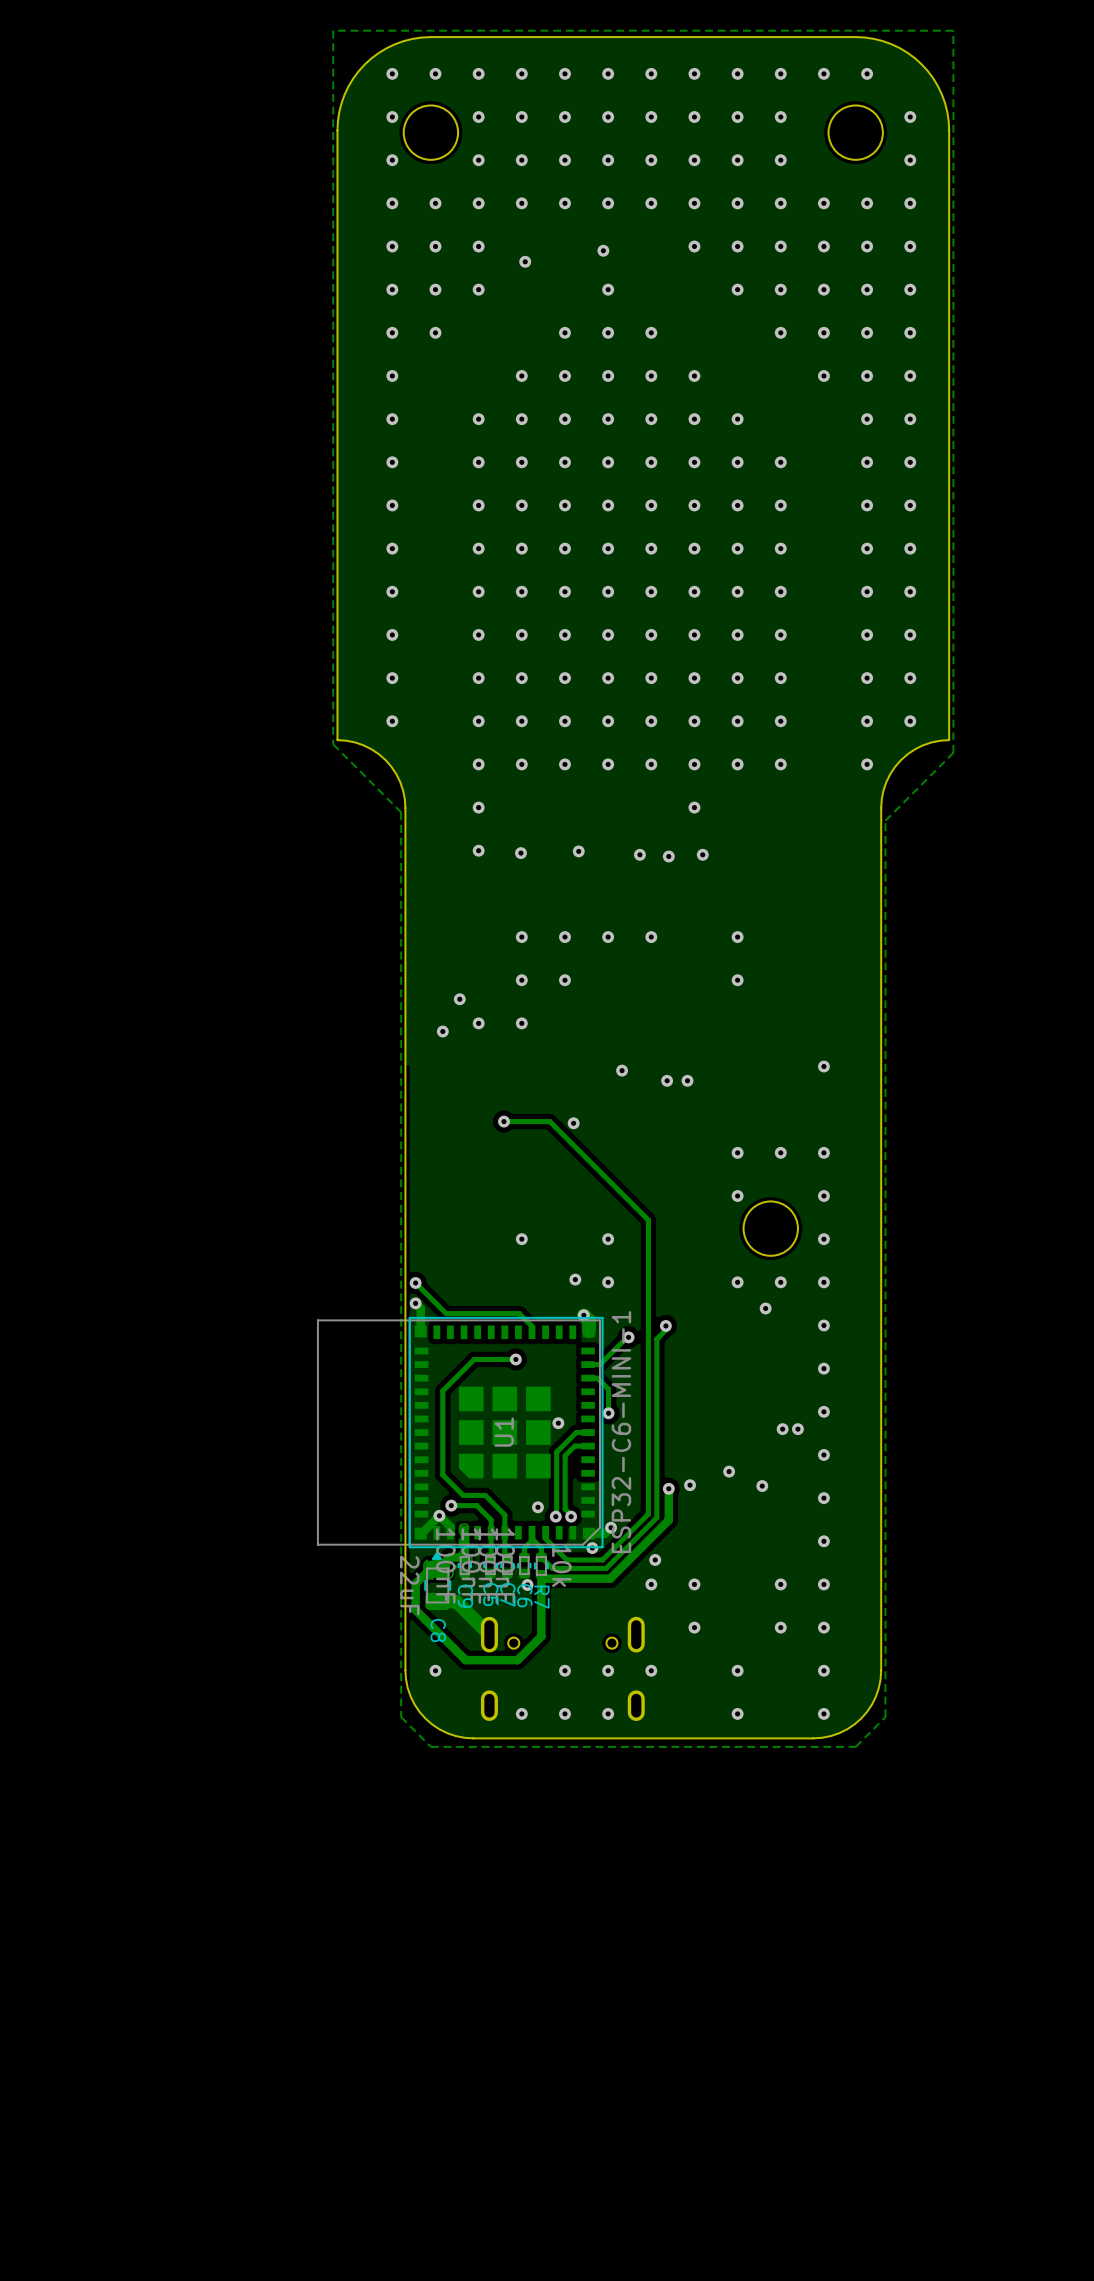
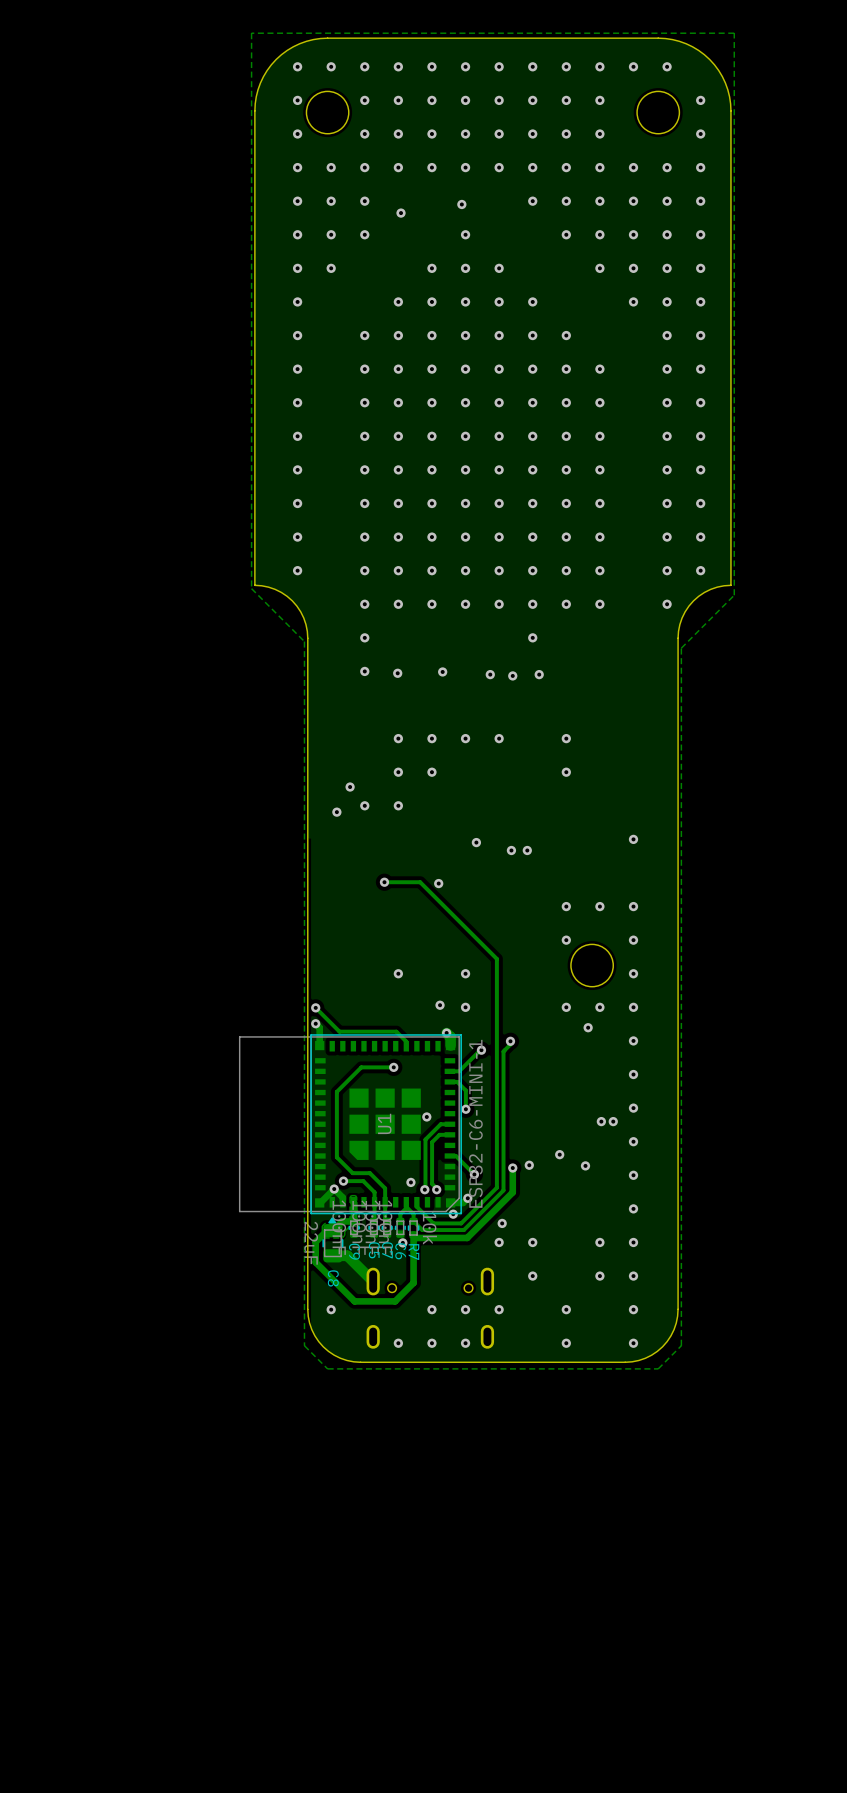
track: none -> (449, 1155) (455, 1155) (474, 1174)
via: none -> (474, 1174)

